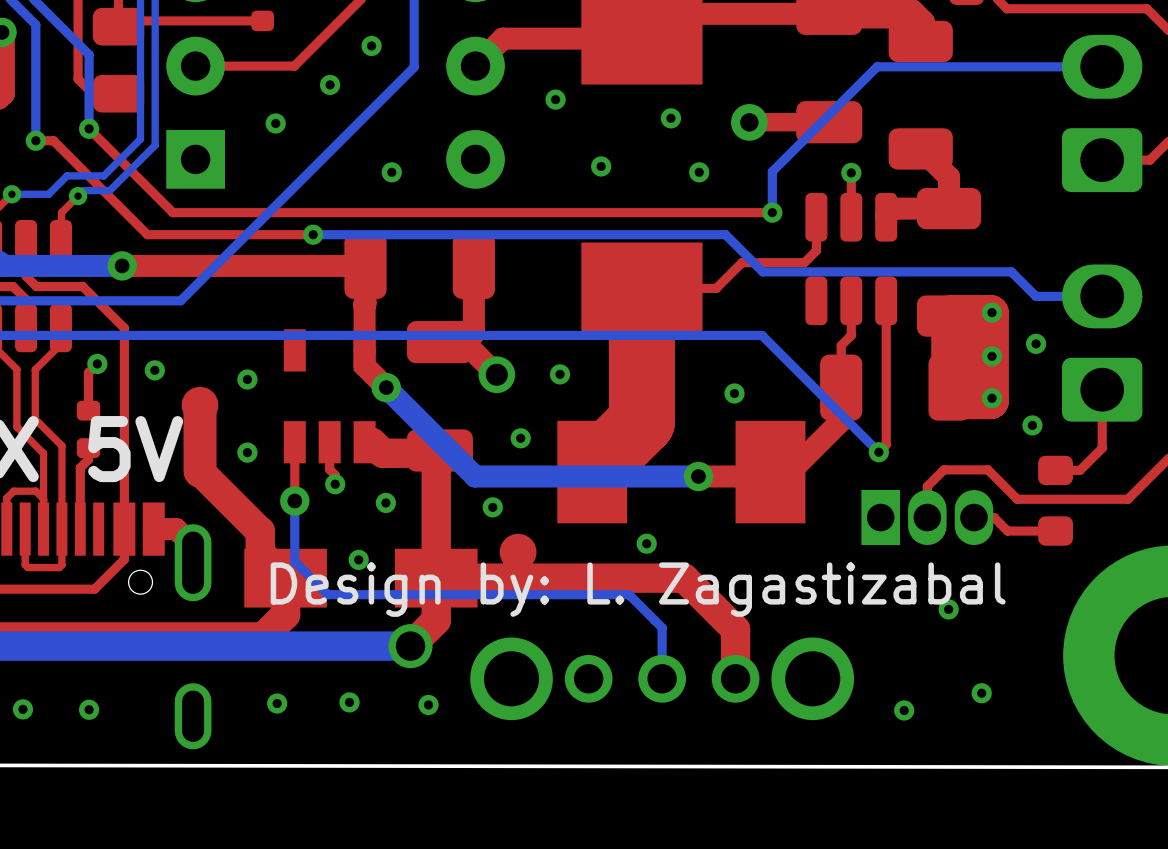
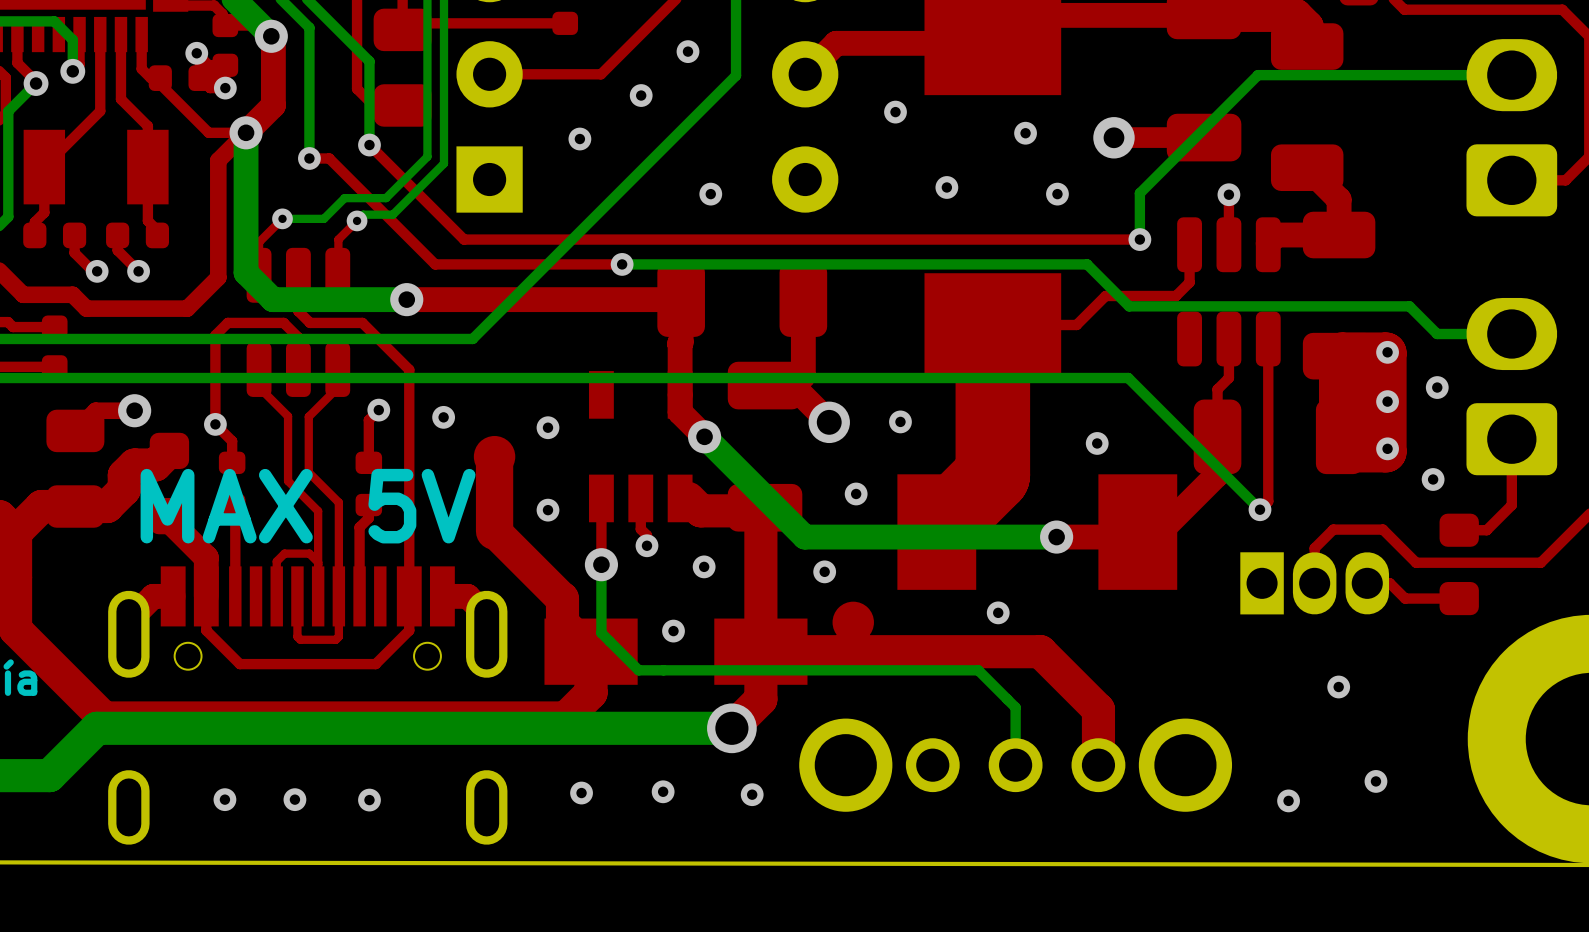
text: Design by: L. Zagastizabal (638, 589) -> none

